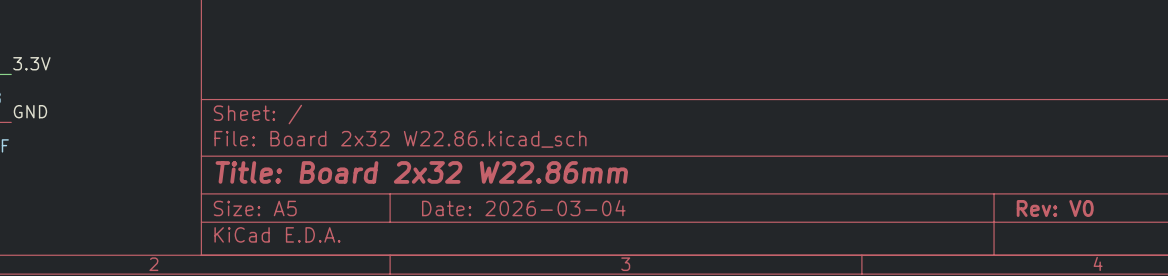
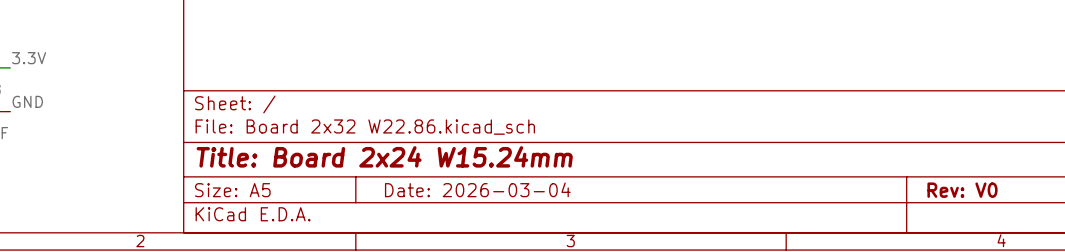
title block: Title: Board 2x32 W22.86mm (421, 172) -> Title: Board 2x24 W15.24mm (384, 156)

